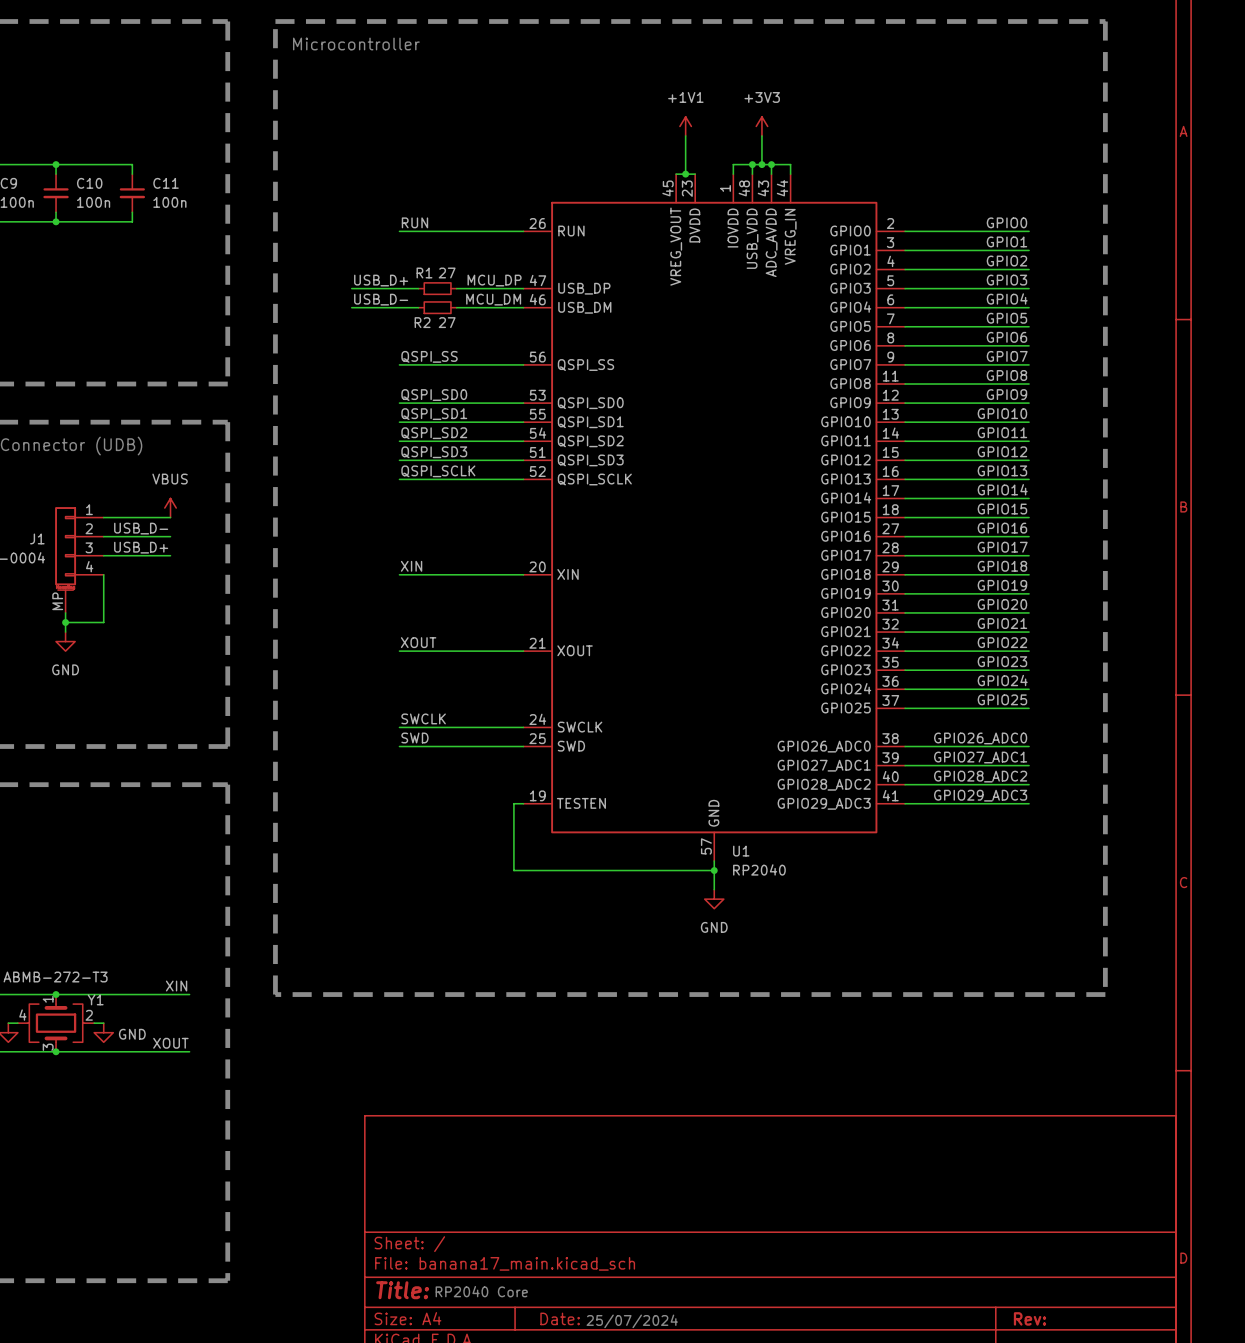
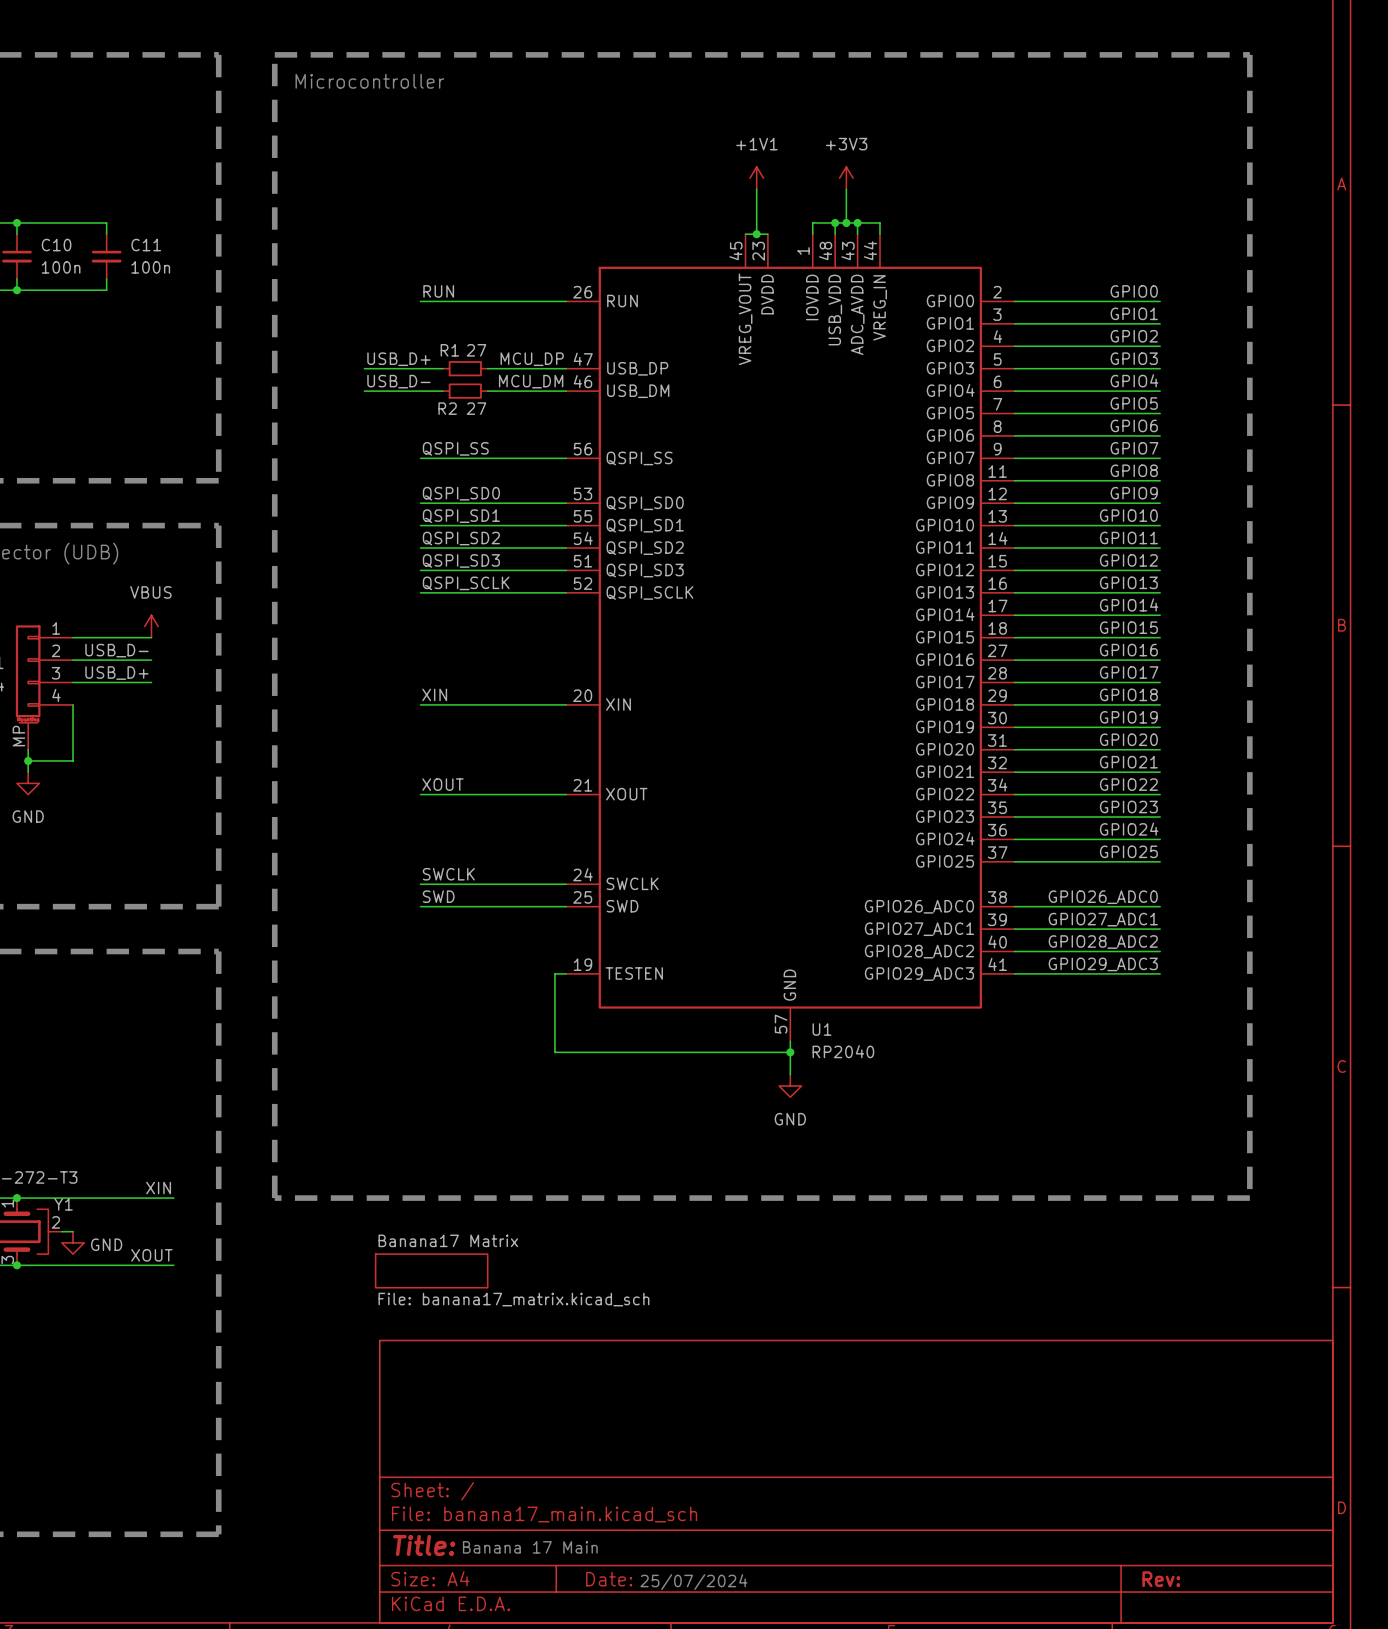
sheet Banana17 Matrix: none -> File: banana17_matrix.kicad_sch (431, 1270)
text: RP2040 Core (481, 1291) -> none
text: none -> Banana 17 Main (530, 1547)

